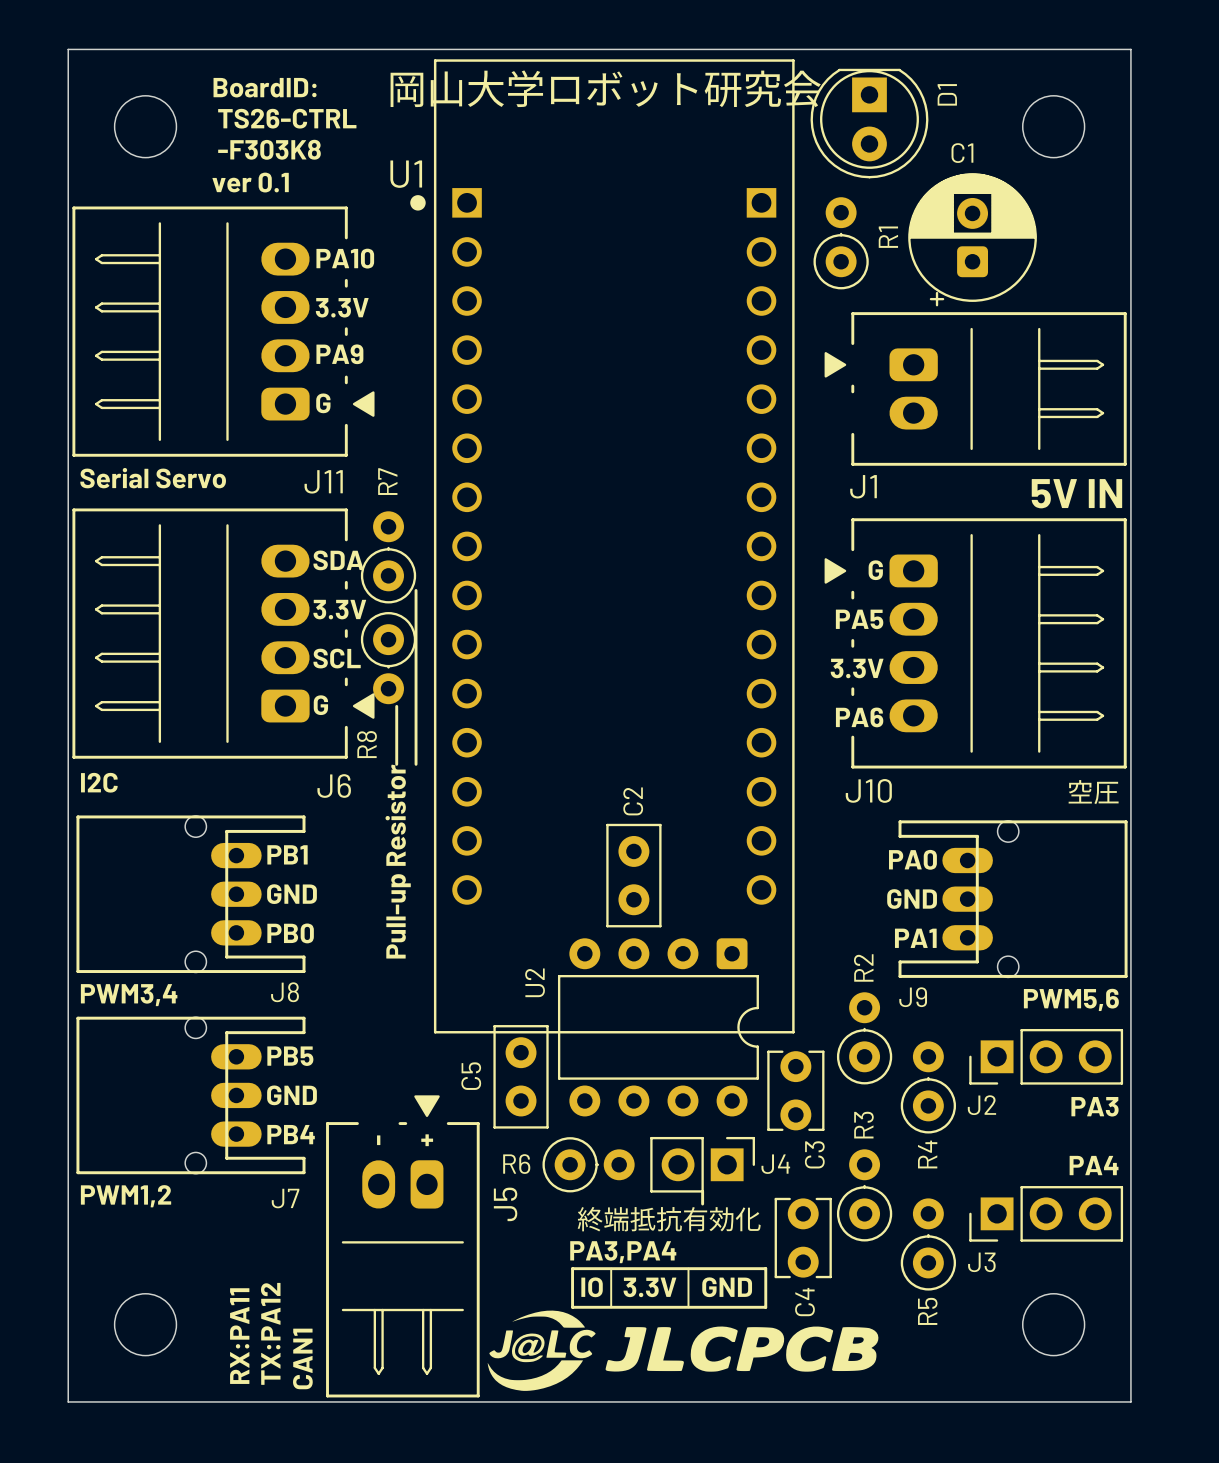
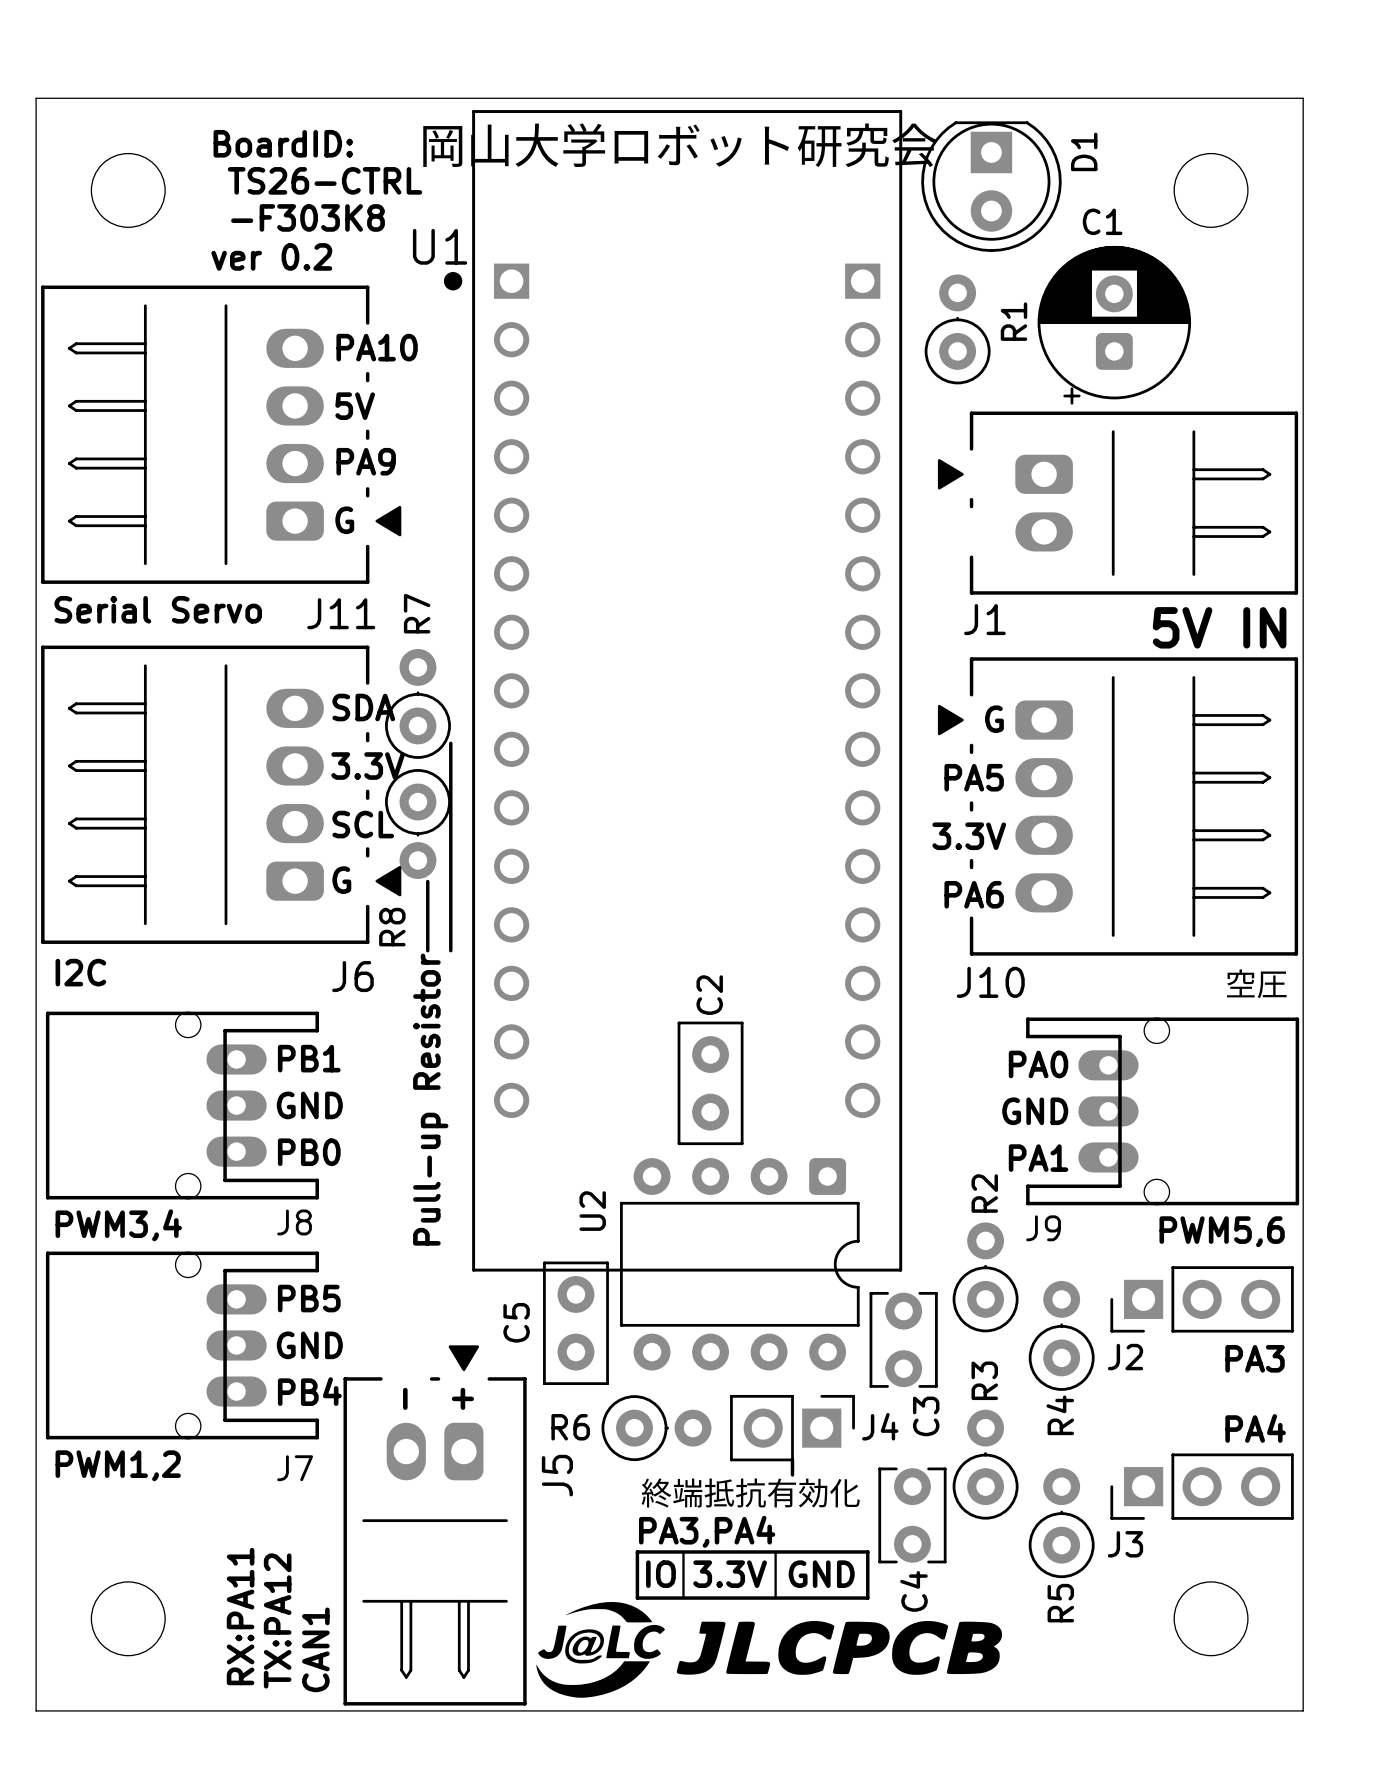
text: ver 0.1 (250, 182) -> ver 0.2 (271, 256)
text: 3.3V (342, 307) -> 5V (355, 406)

